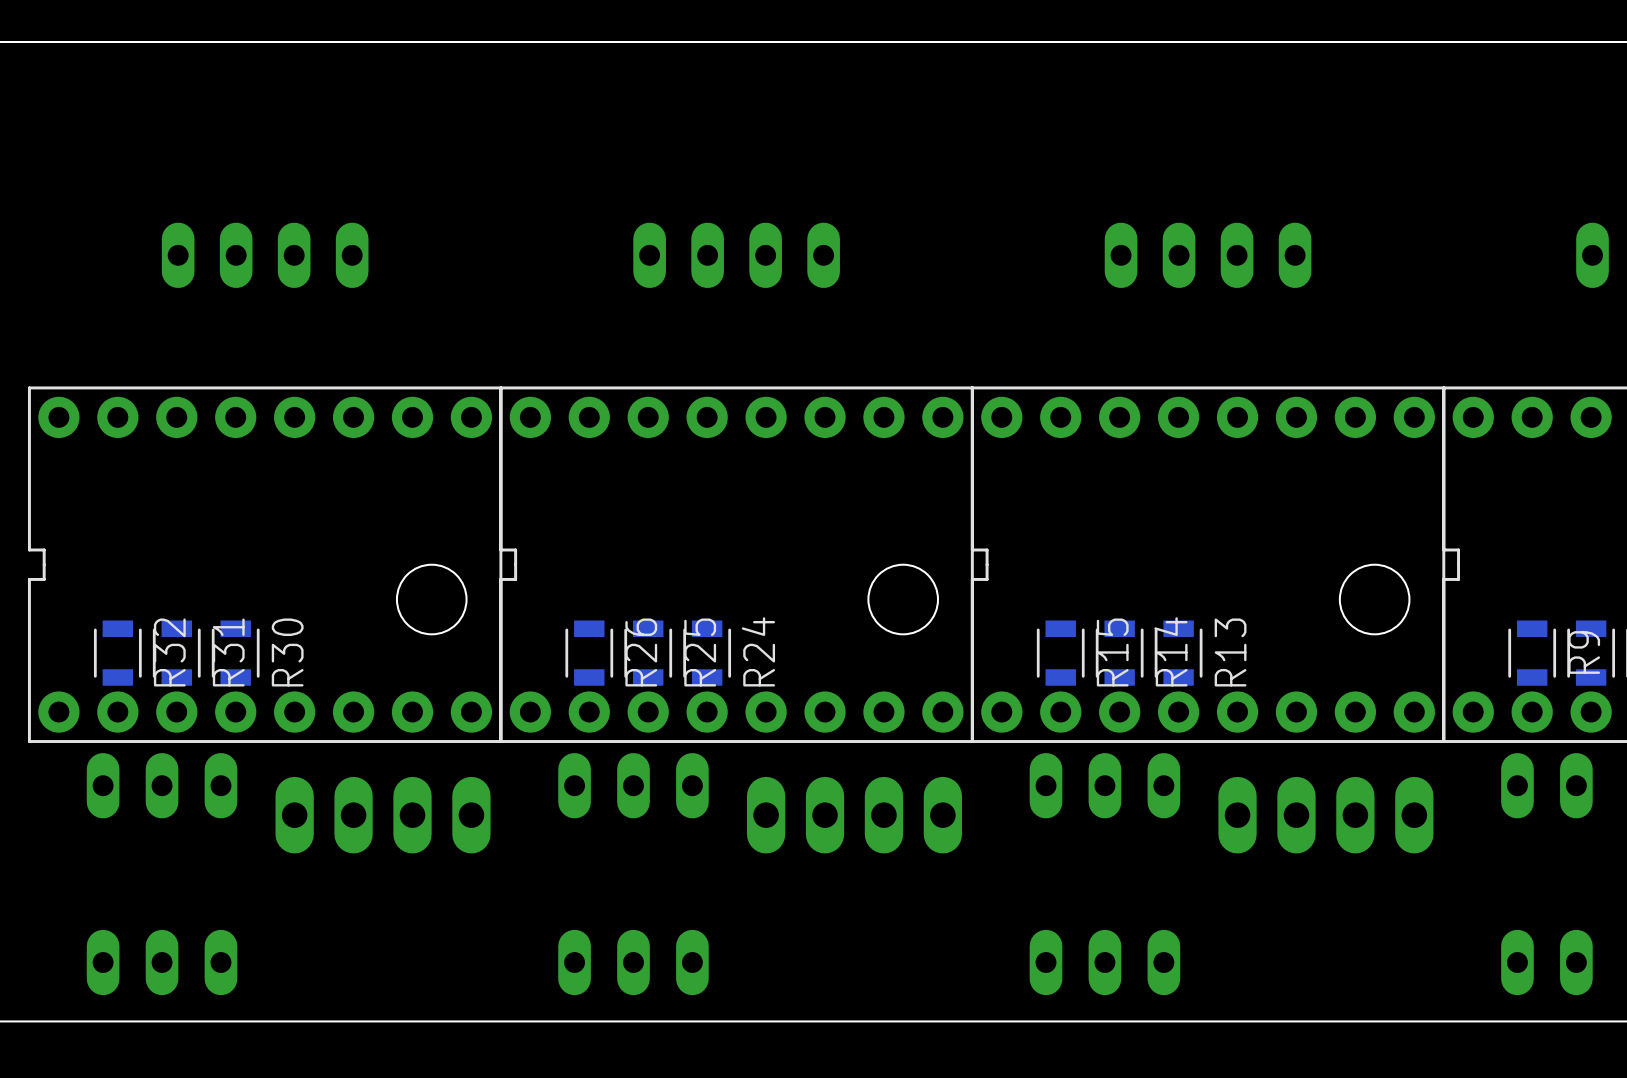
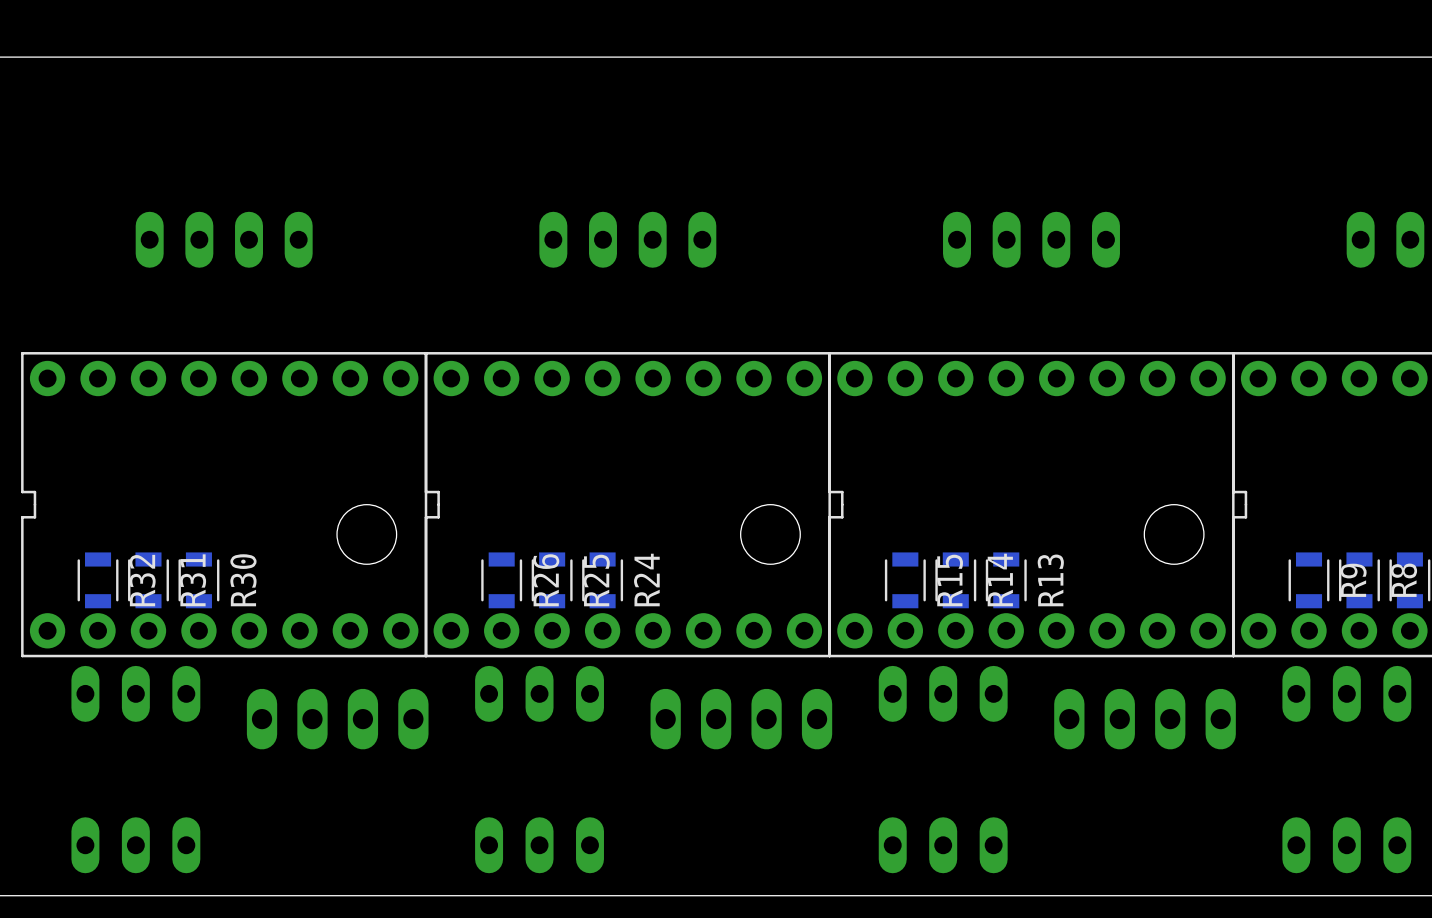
part footprint: [275, 776, 491, 854] -> [246, 688, 429, 750]
part footprint: [746, 776, 963, 854] -> [650, 688, 833, 750]
part footprint: [1218, 776, 1434, 854] -> [1054, 688, 1236, 750]

